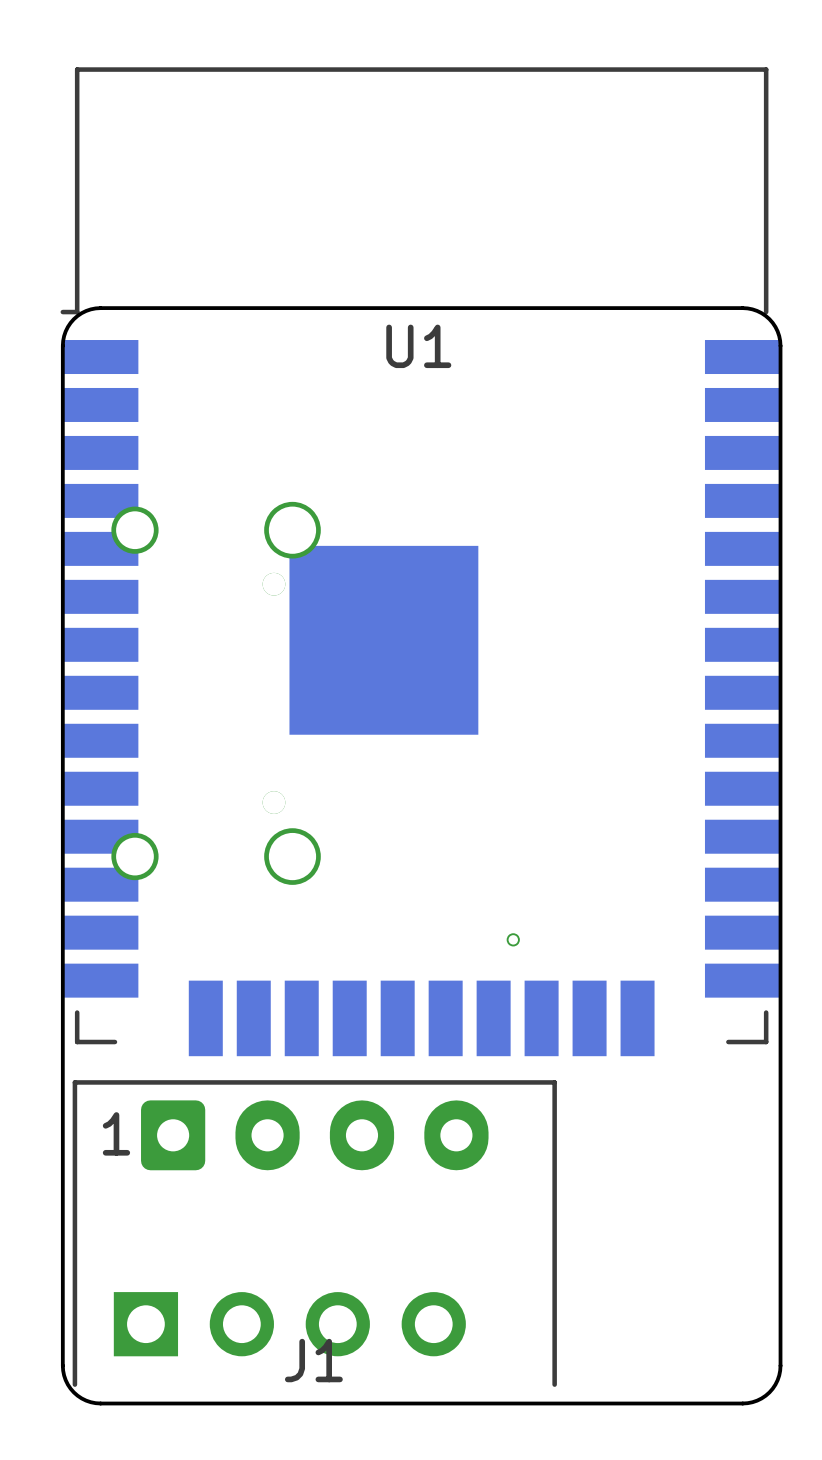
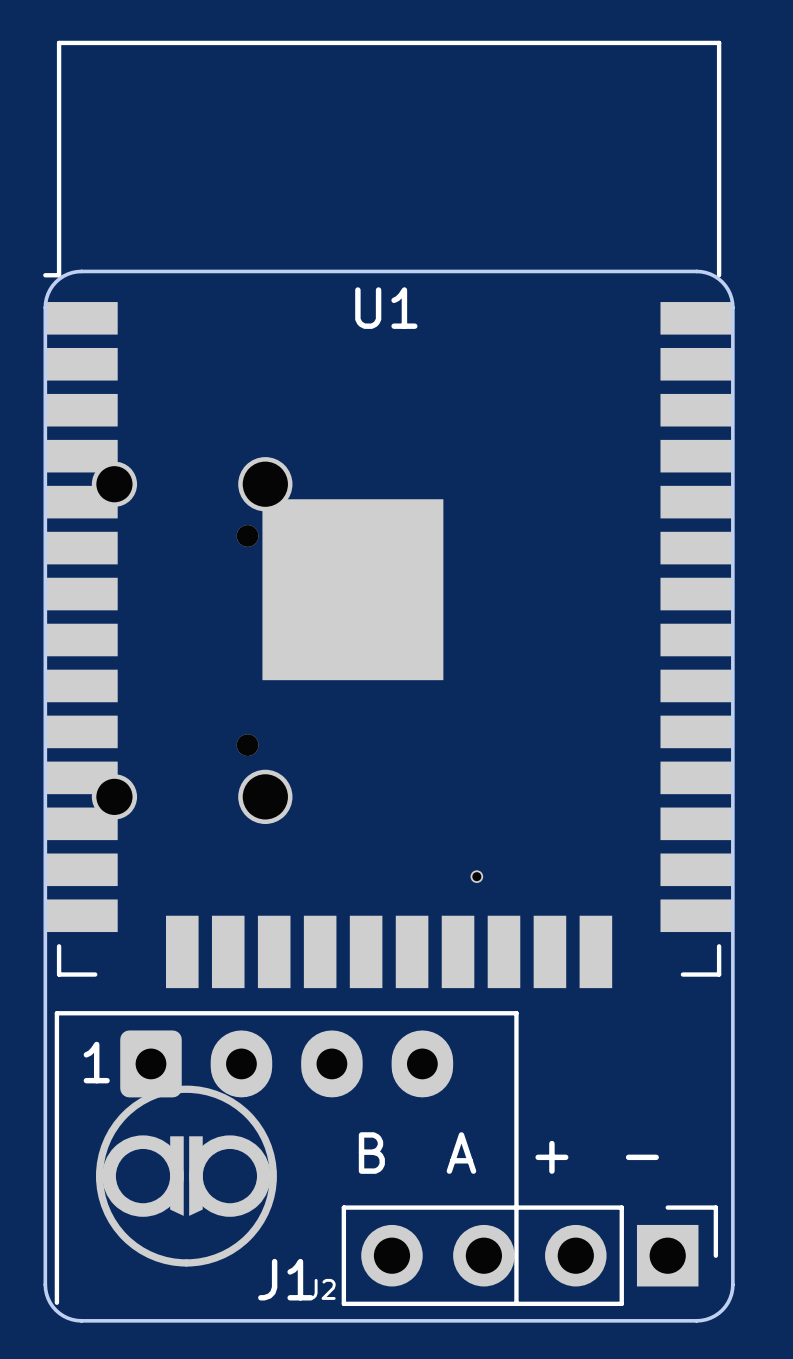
text: none -> B (371, 1153)
text: none -> A (461, 1153)
text: none -> + (551, 1157)
text: none -> - (642, 1157)
part: none -> (186, 1176)
J2 side: top (289, 1324) -> bottom (529, 1255)

